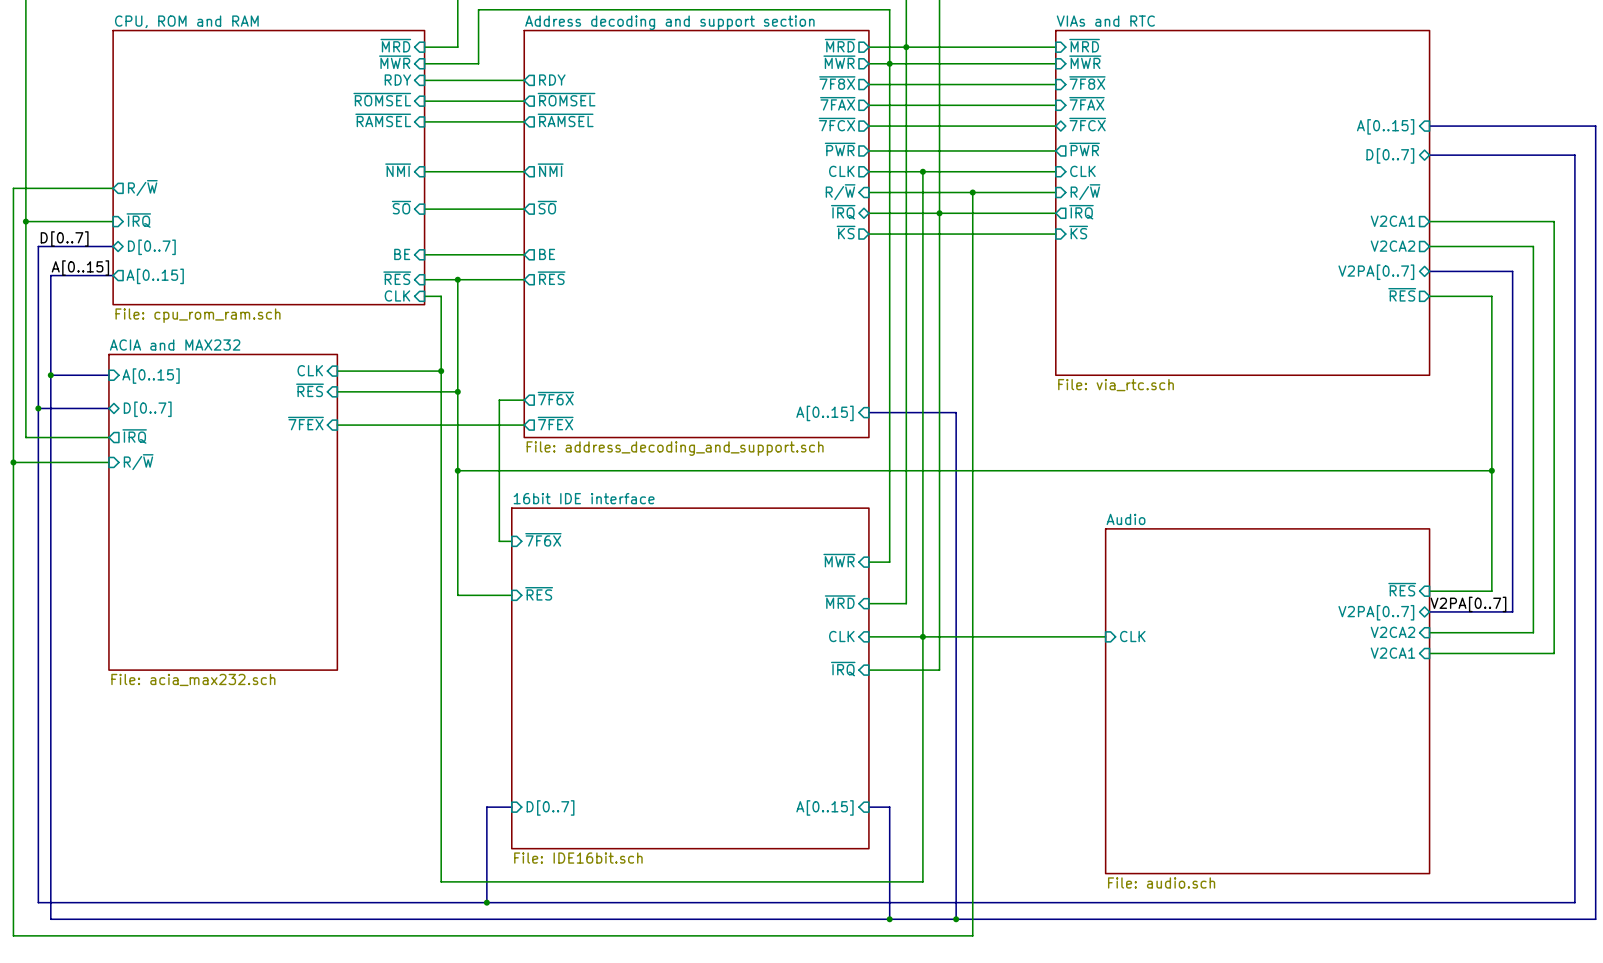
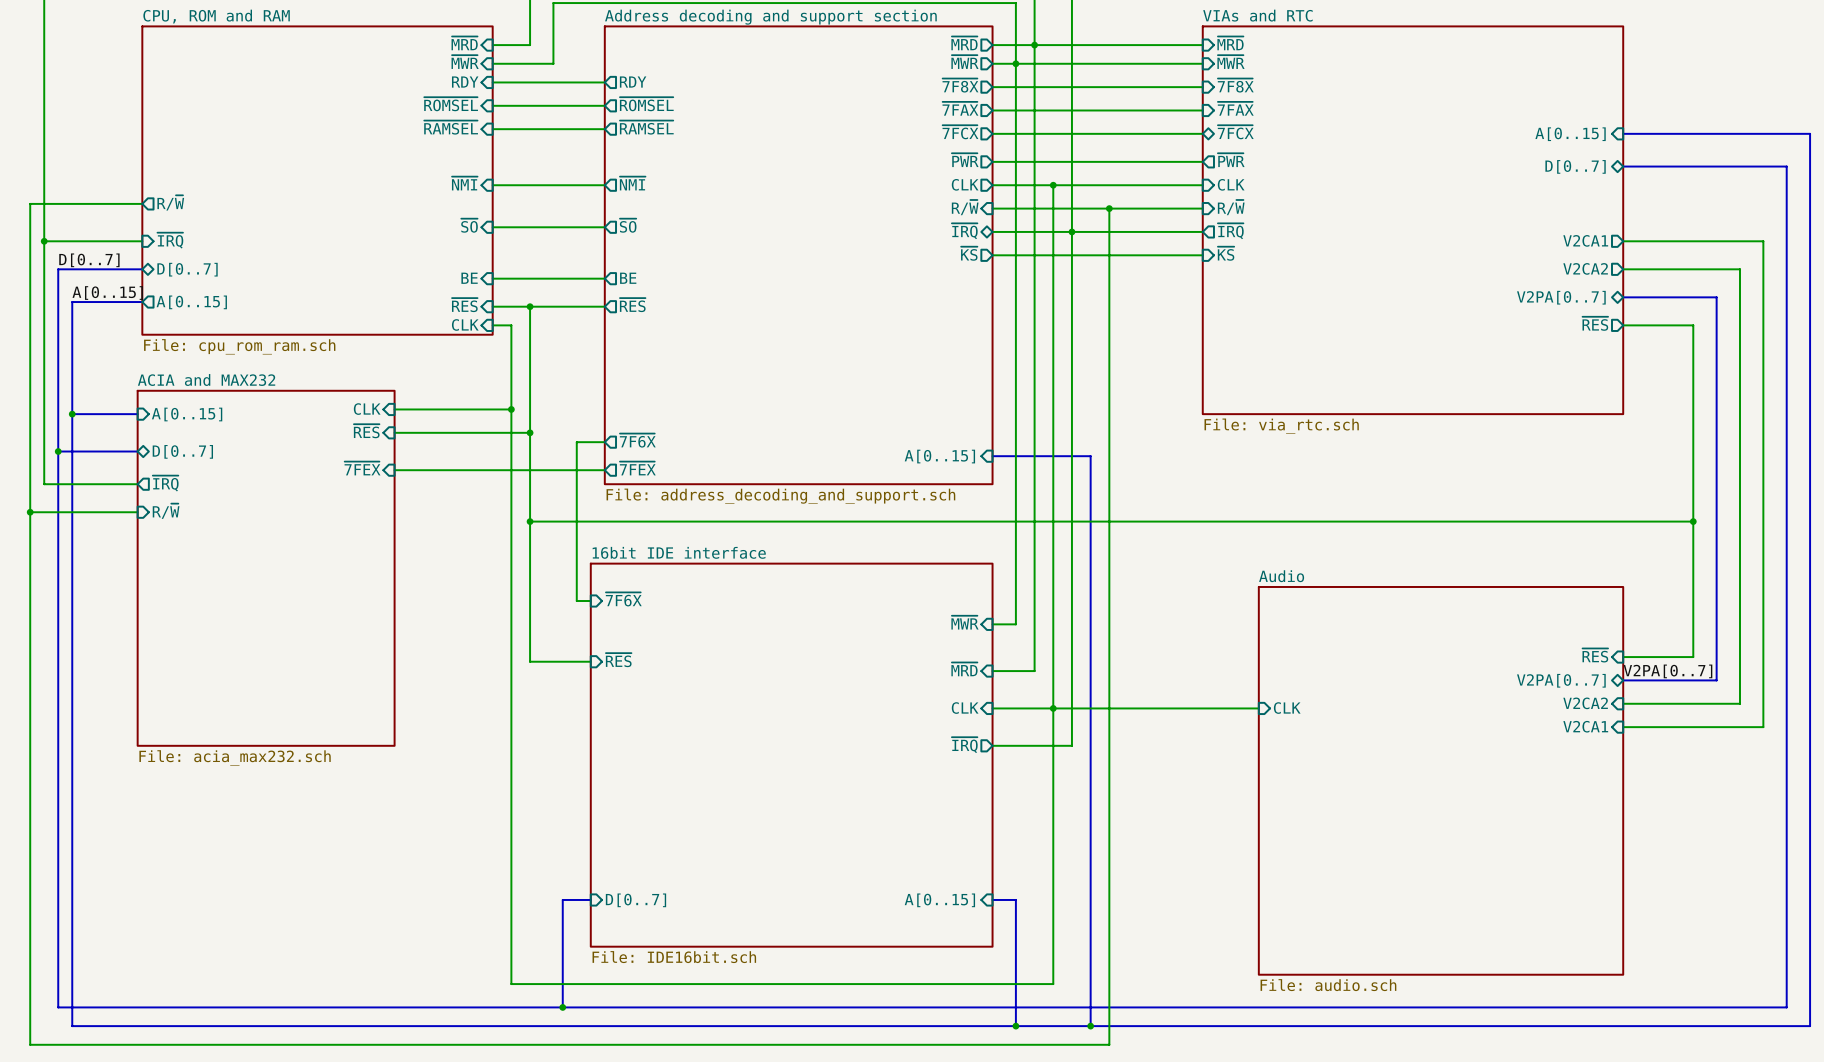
sheet pin shape: input (843, 669) -> output (964, 745)

